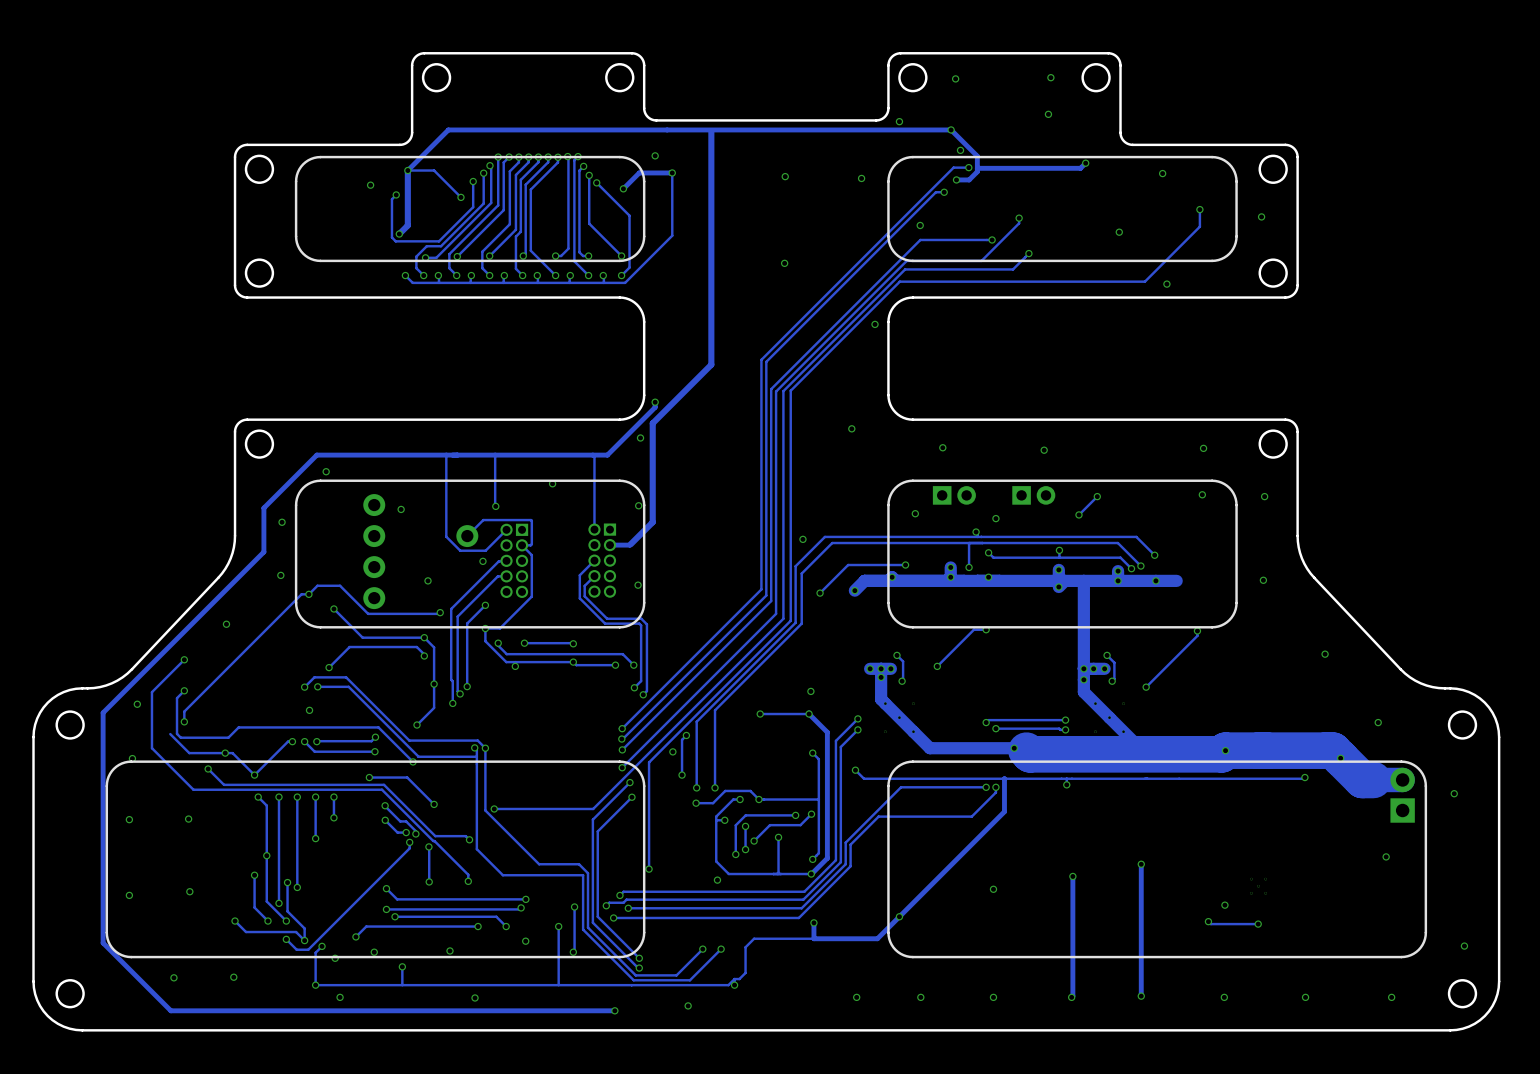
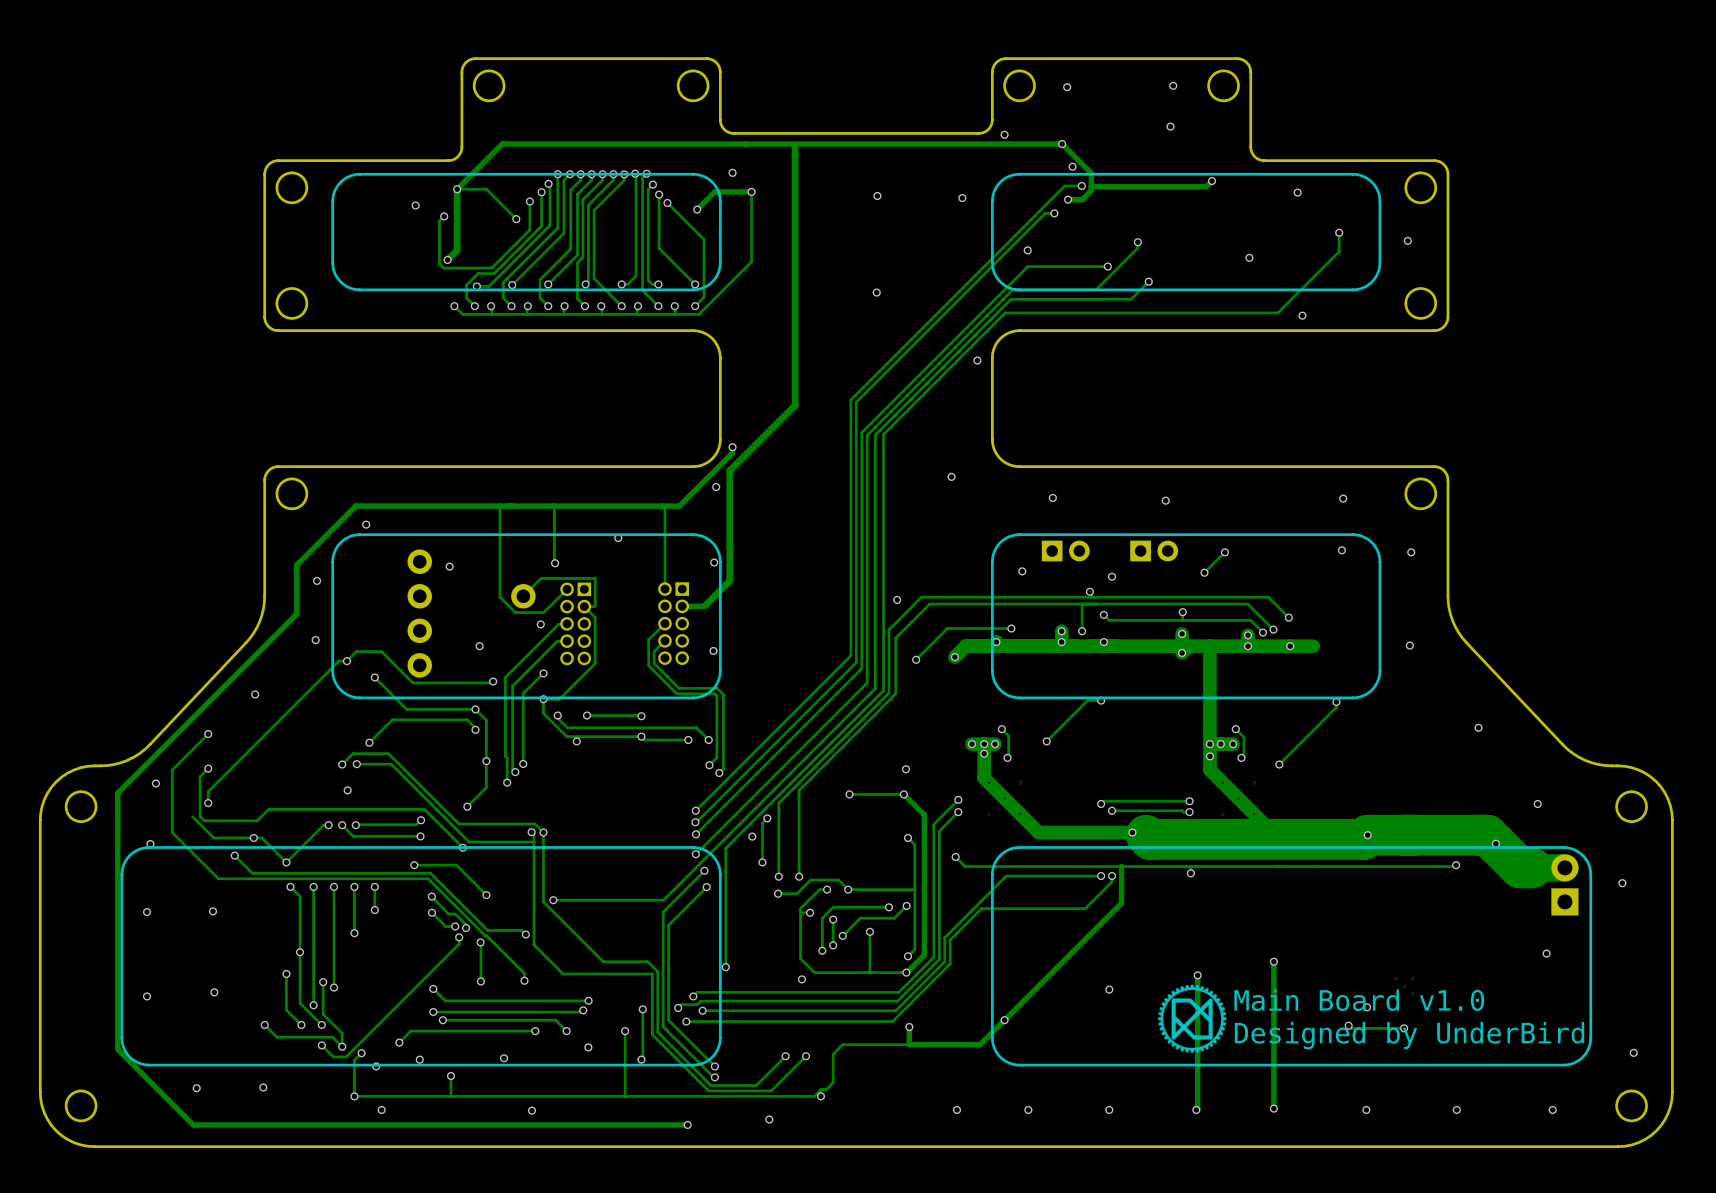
drawing: none -> [1158, 984, 1227, 1053]
text: none -> Main Board v1.0 (1359, 1000)
text: none -> Designed by UnderBird (1409, 1035)

